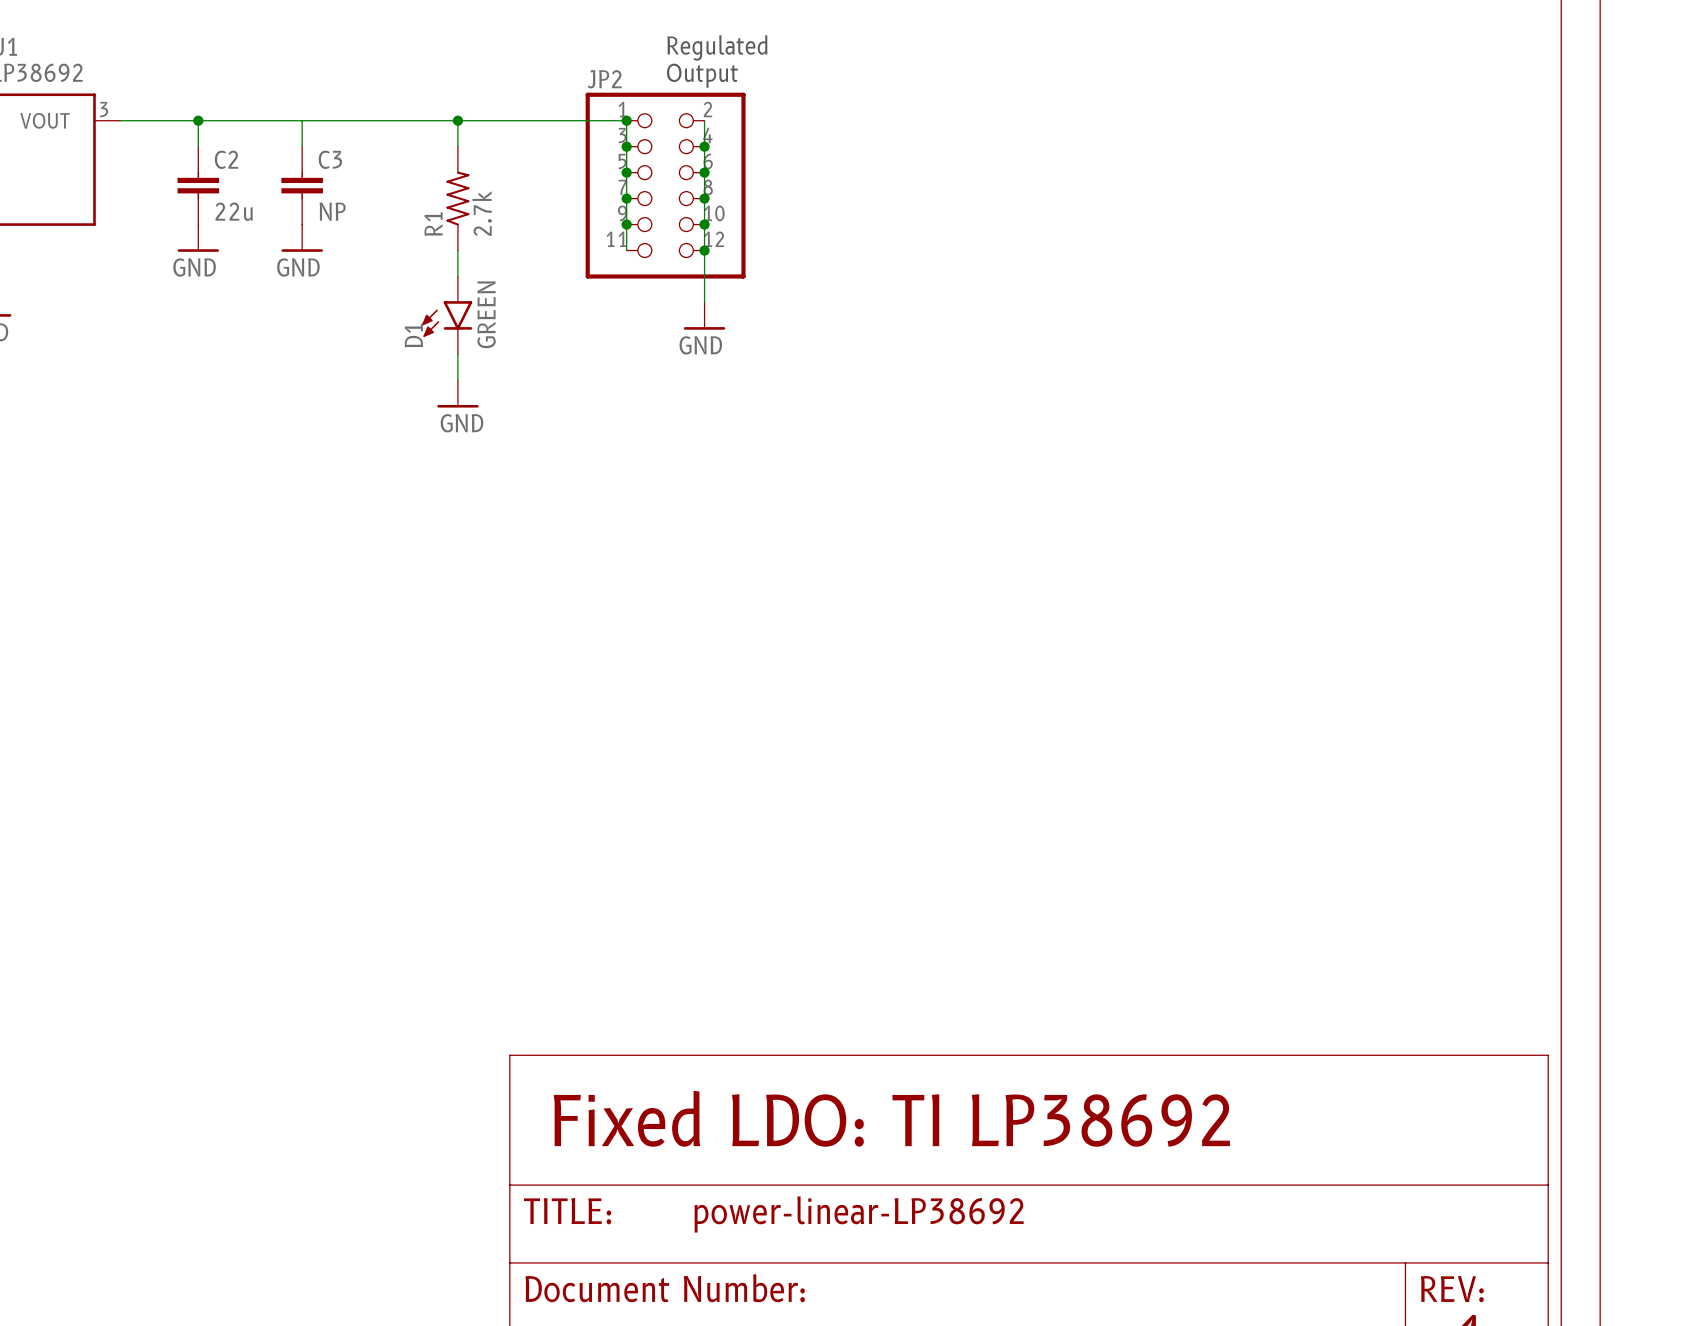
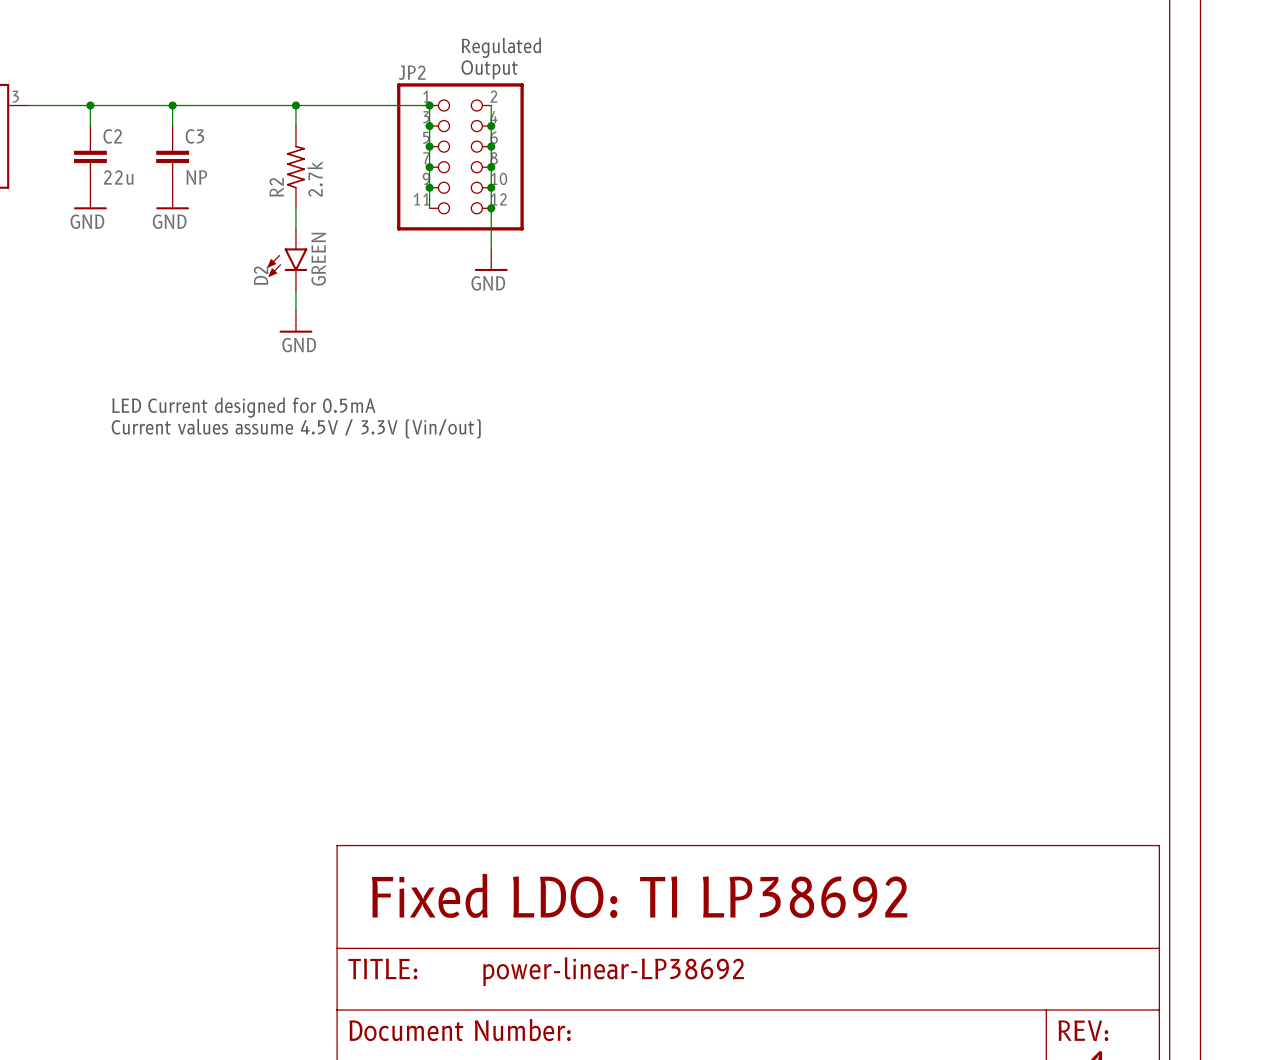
junction: none -> (172, 105)
R1 name: R1 (433, 224) -> R2 (276, 187)
D1 name: D1 (413, 335) -> D2 (261, 275)
text: none -> LED Current designed for 0.5mA (243, 407)
text: none -> Current values assume 4.5V / 3.3V (Vin/out) (296, 428)

